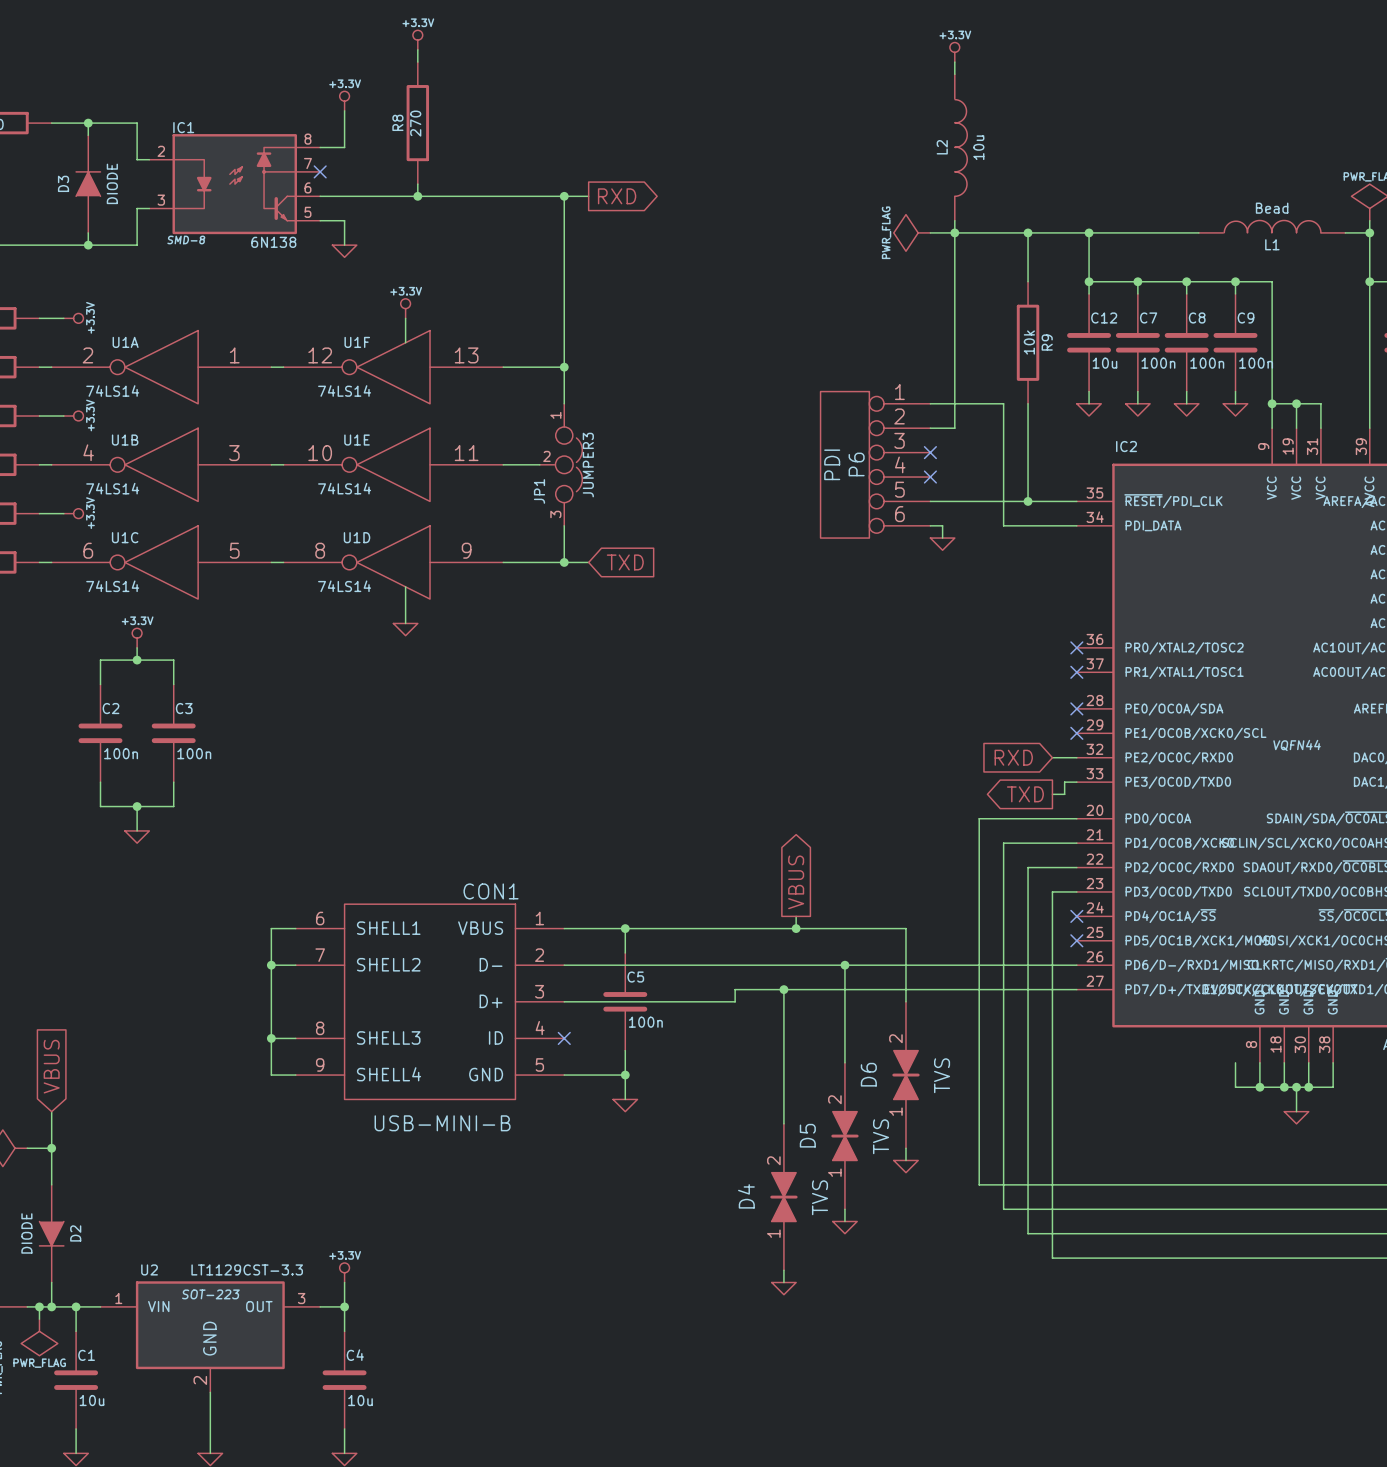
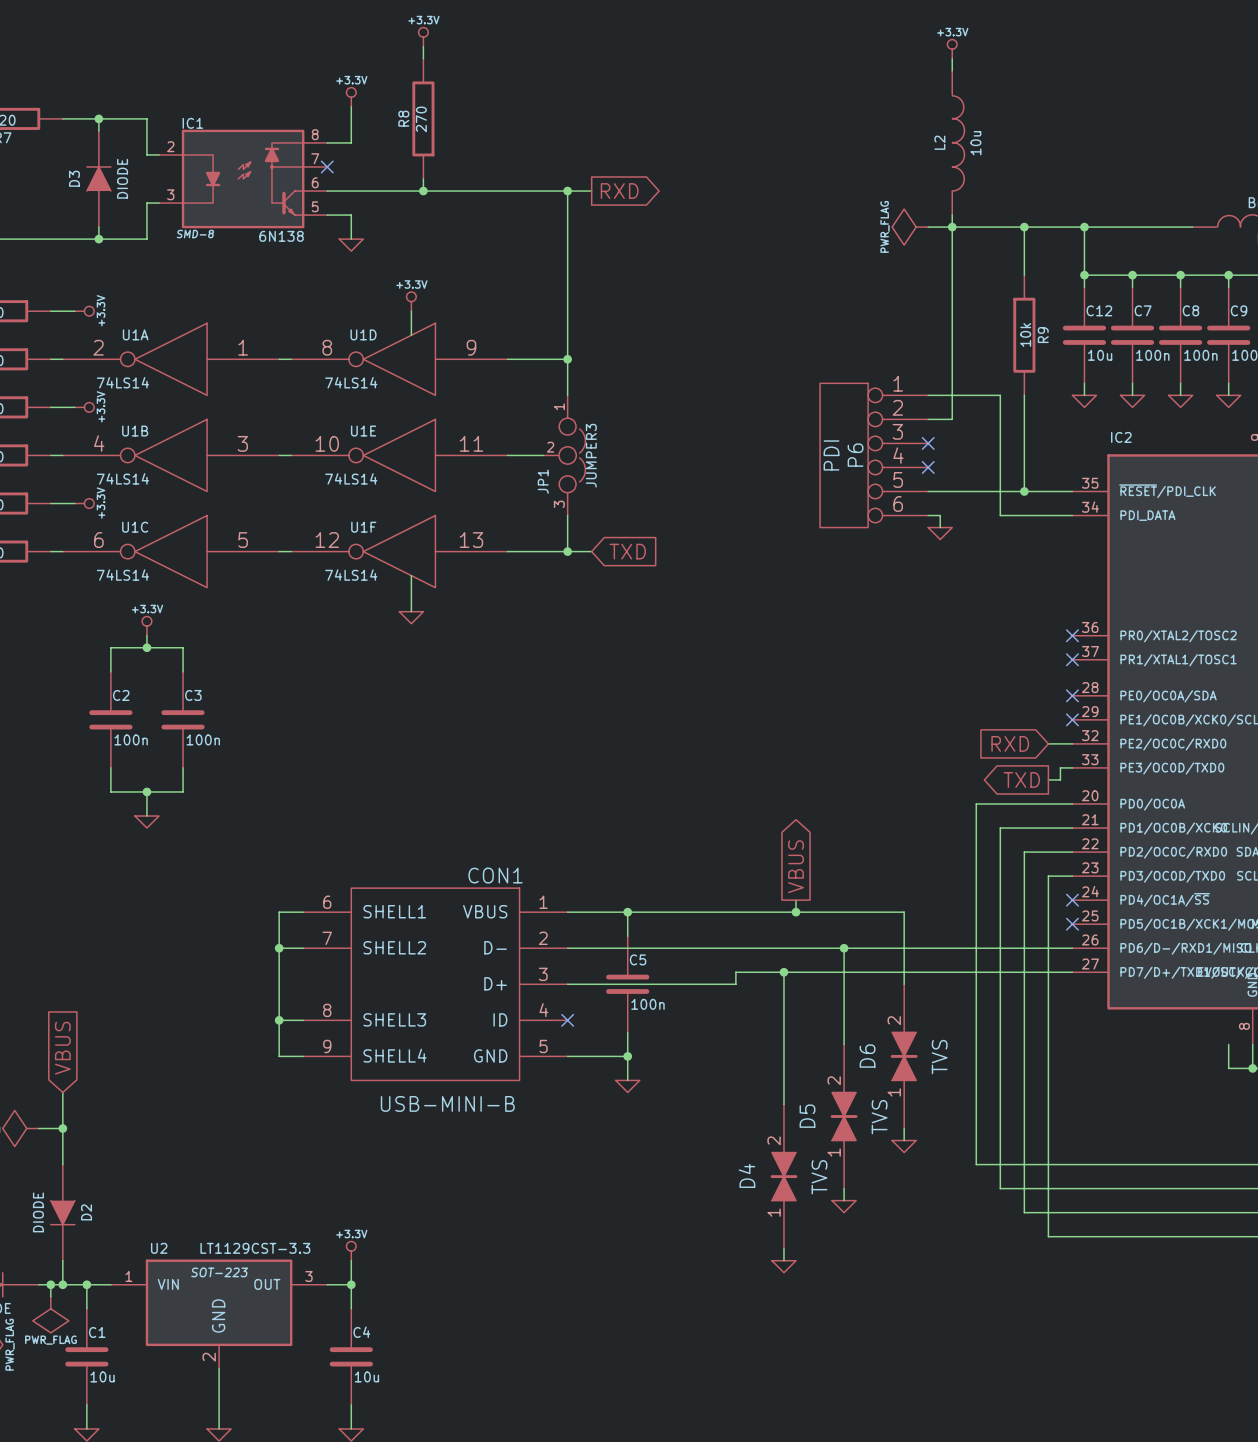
U1F position: (393, 367) -> (399, 551)
U1D position: (393, 562) -> (399, 359)

